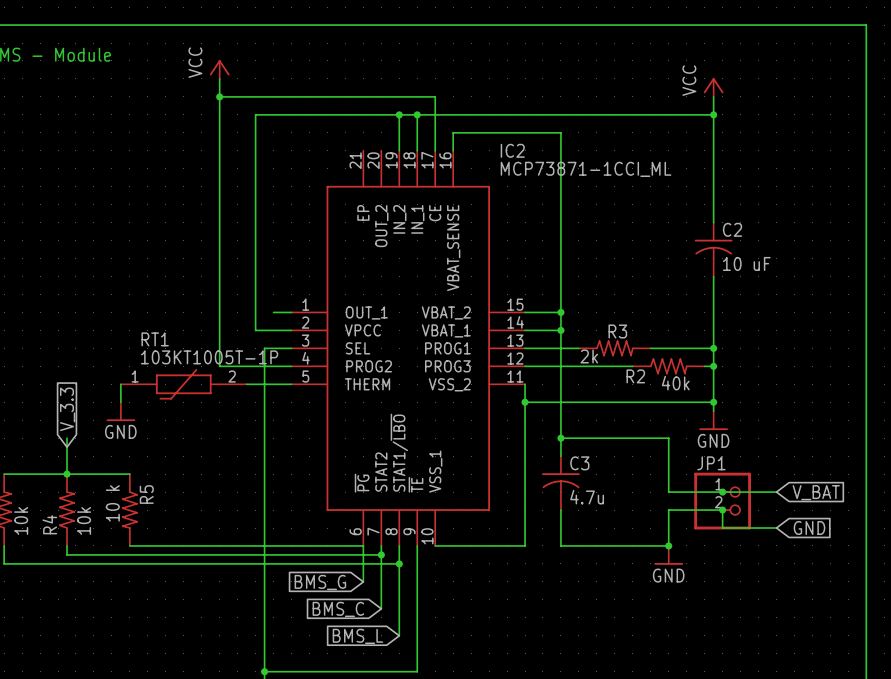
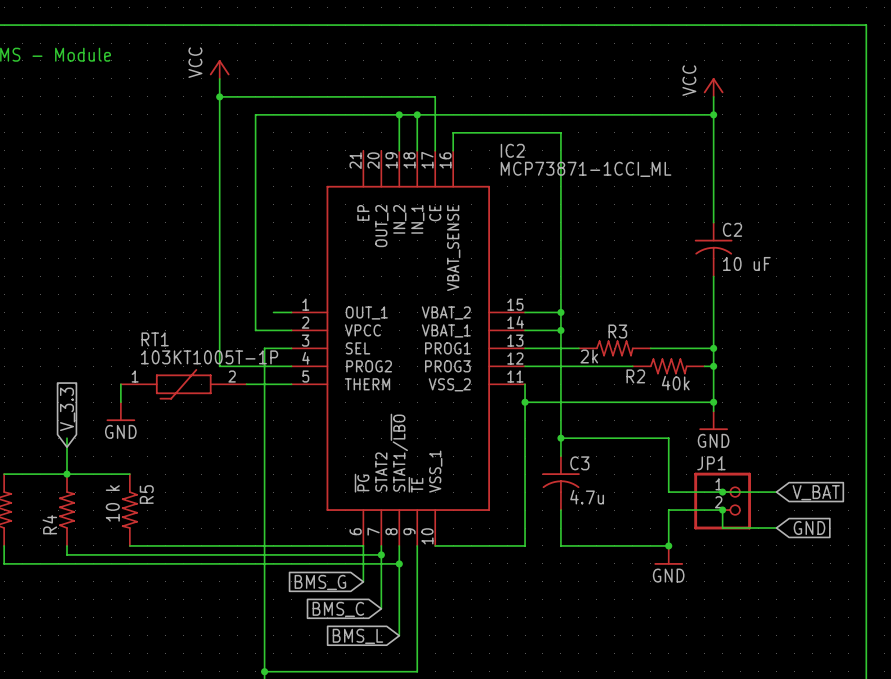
part value: 10k (21, 520) -> none
R4 value: 10k (84, 520) -> none

